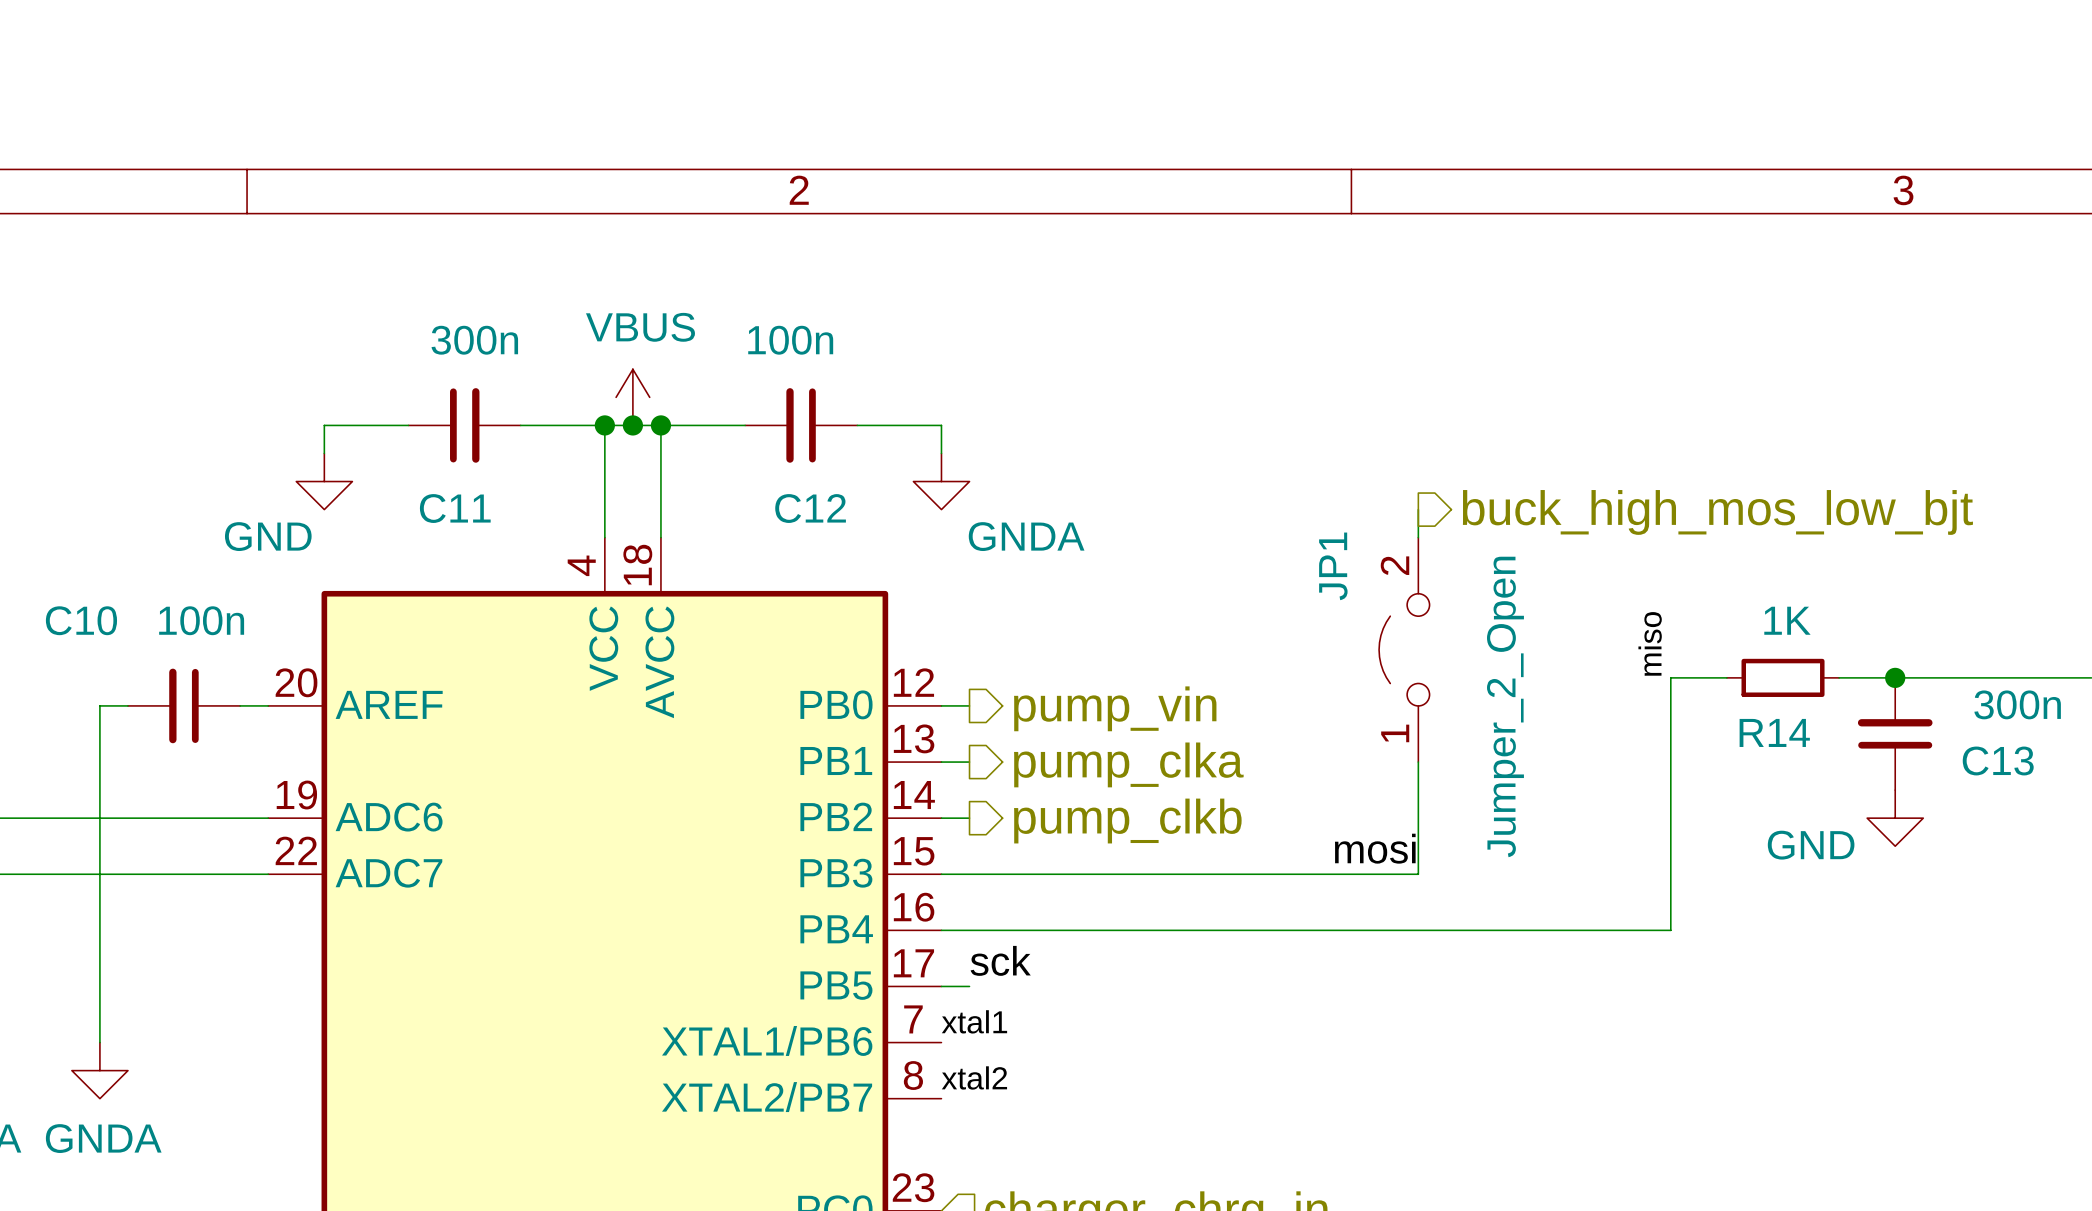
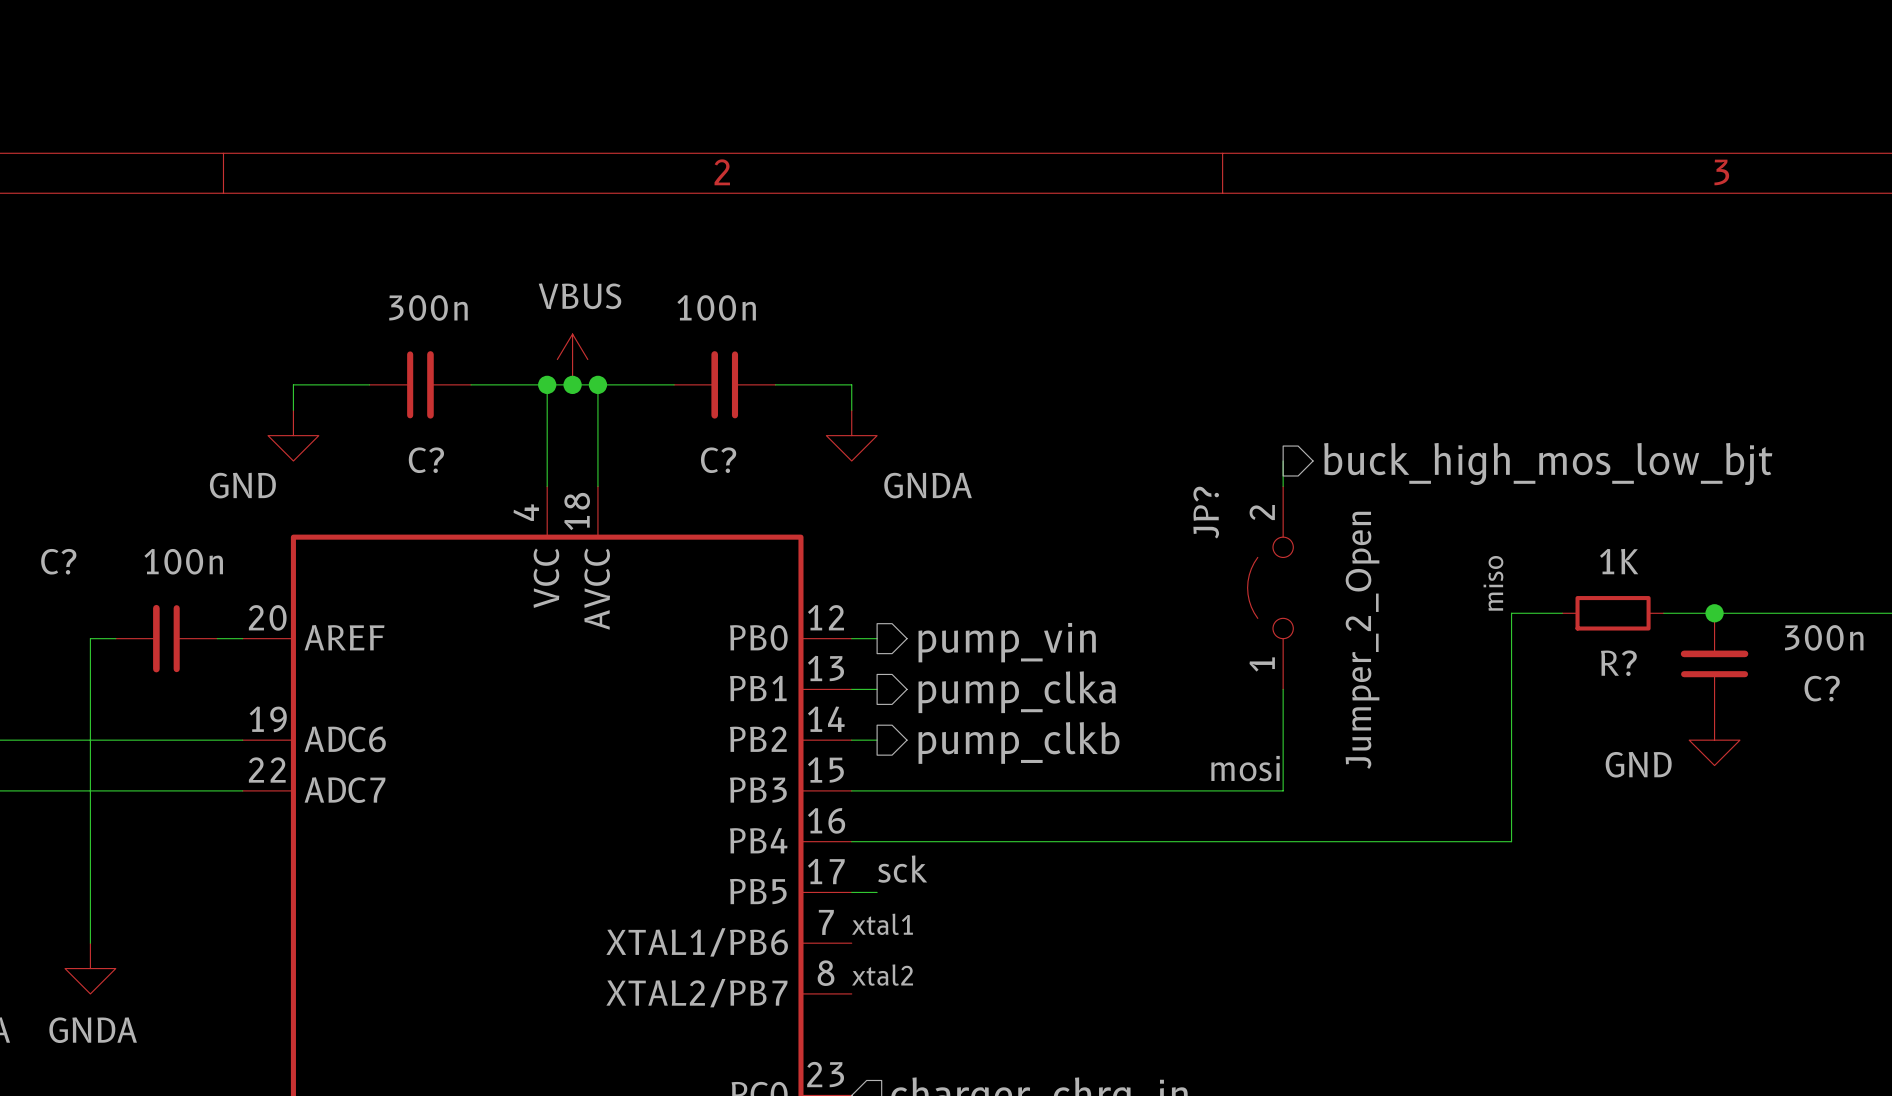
C11 name: C11 (455, 508) -> C? (426, 460)
C12 name: C12 (810, 508) -> C? (718, 460)
JP1 name: JP1 (1333, 566) -> JP? (1206, 512)
C10 name: C10 (81, 620) -> C? (58, 561)
R14 name: R14 (1774, 732) -> R? (1618, 663)
C13 name: C13 (1998, 760) -> C? (1822, 688)

